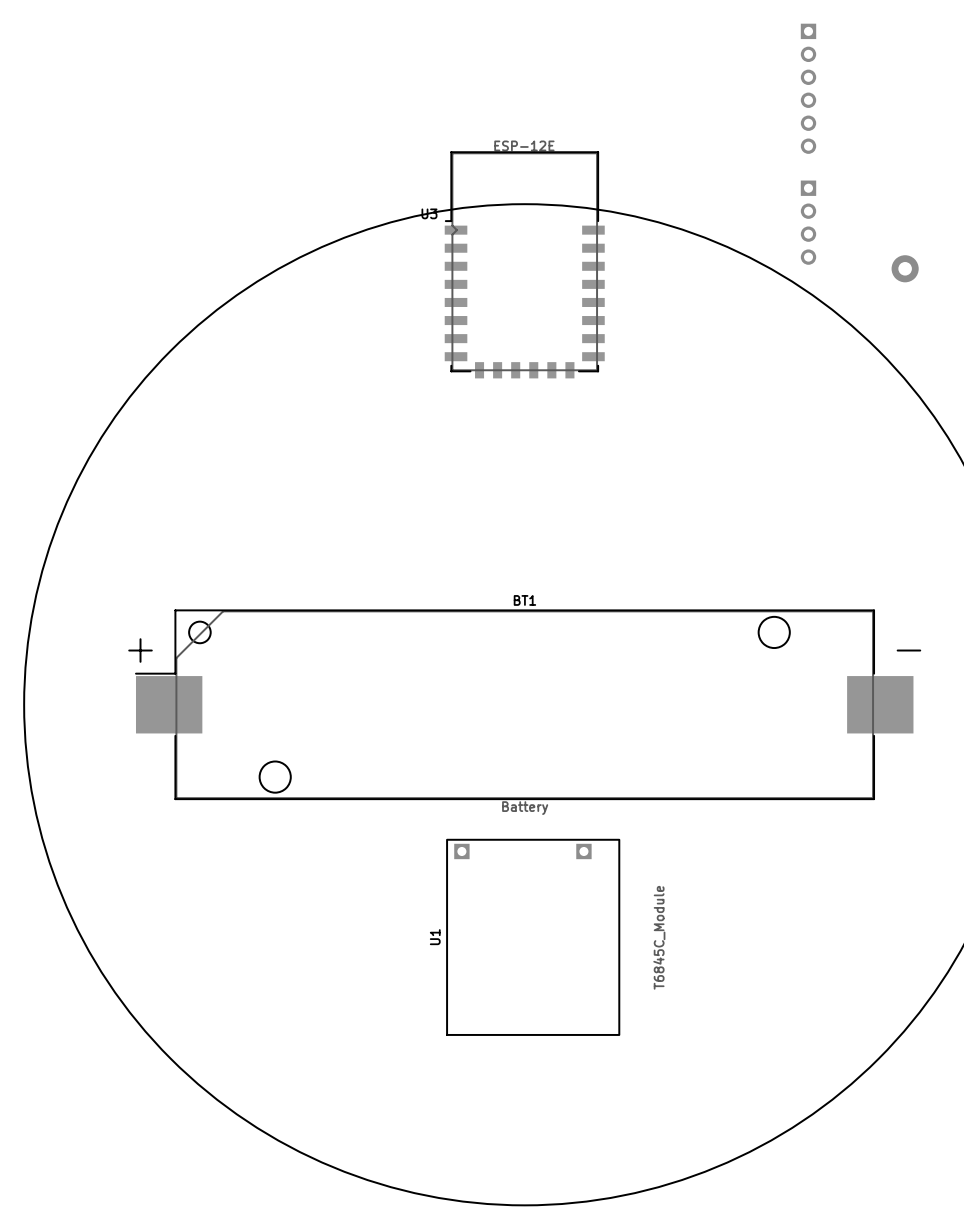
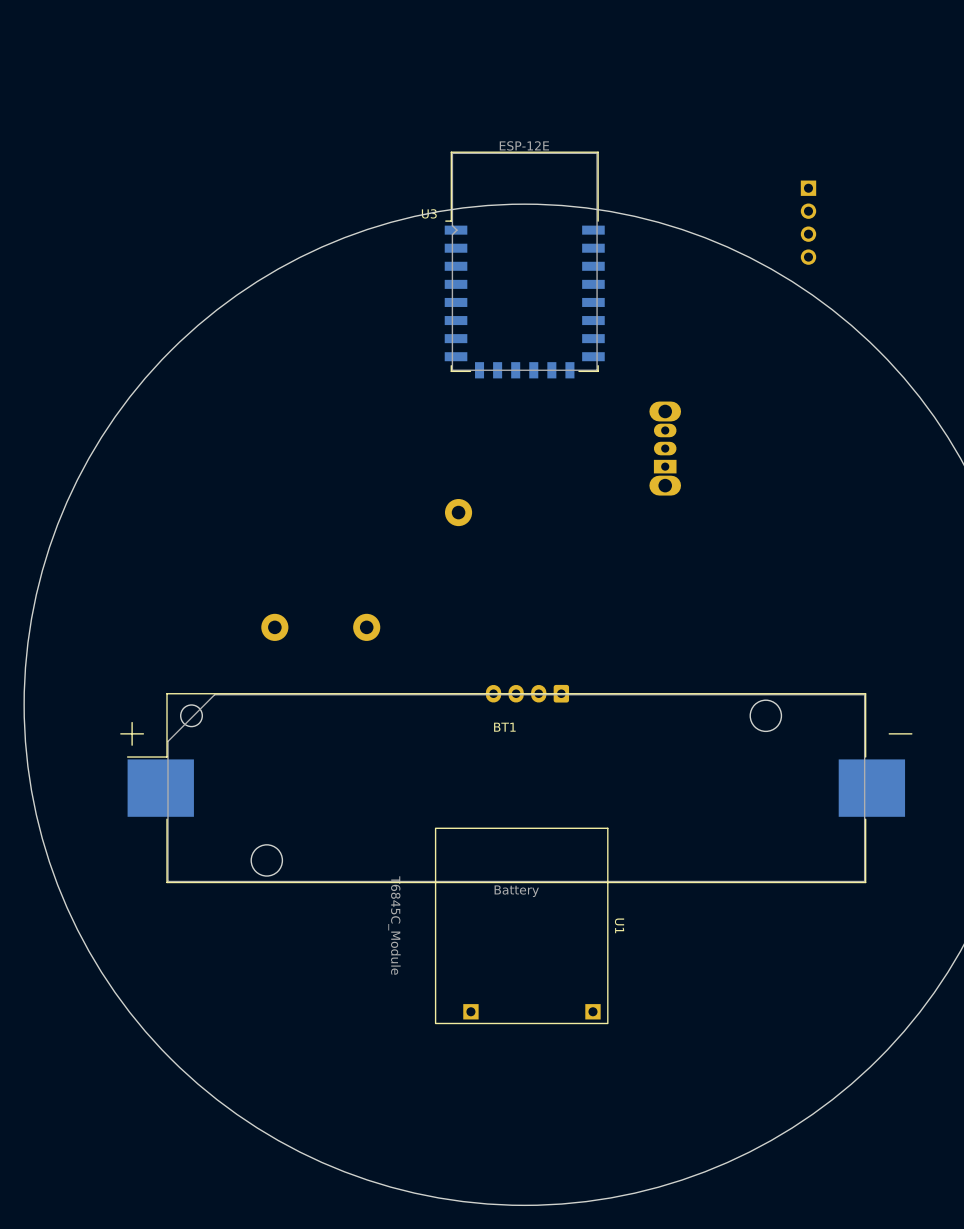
part: (808, 88) -> none
part: (905, 268) -> none
part: none -> (665, 448)
part: none -> (458, 512)
BT1 name position: BT1 (524, 600) -> BT1 (504, 727)
part: none -> (274, 627)
part: none -> (366, 627)
part: none -> (527, 693)
BT1 position: (524, 704) -> (516, 788)
U1 rotation: 0° (533, 937) -> 180° (521, 925)

